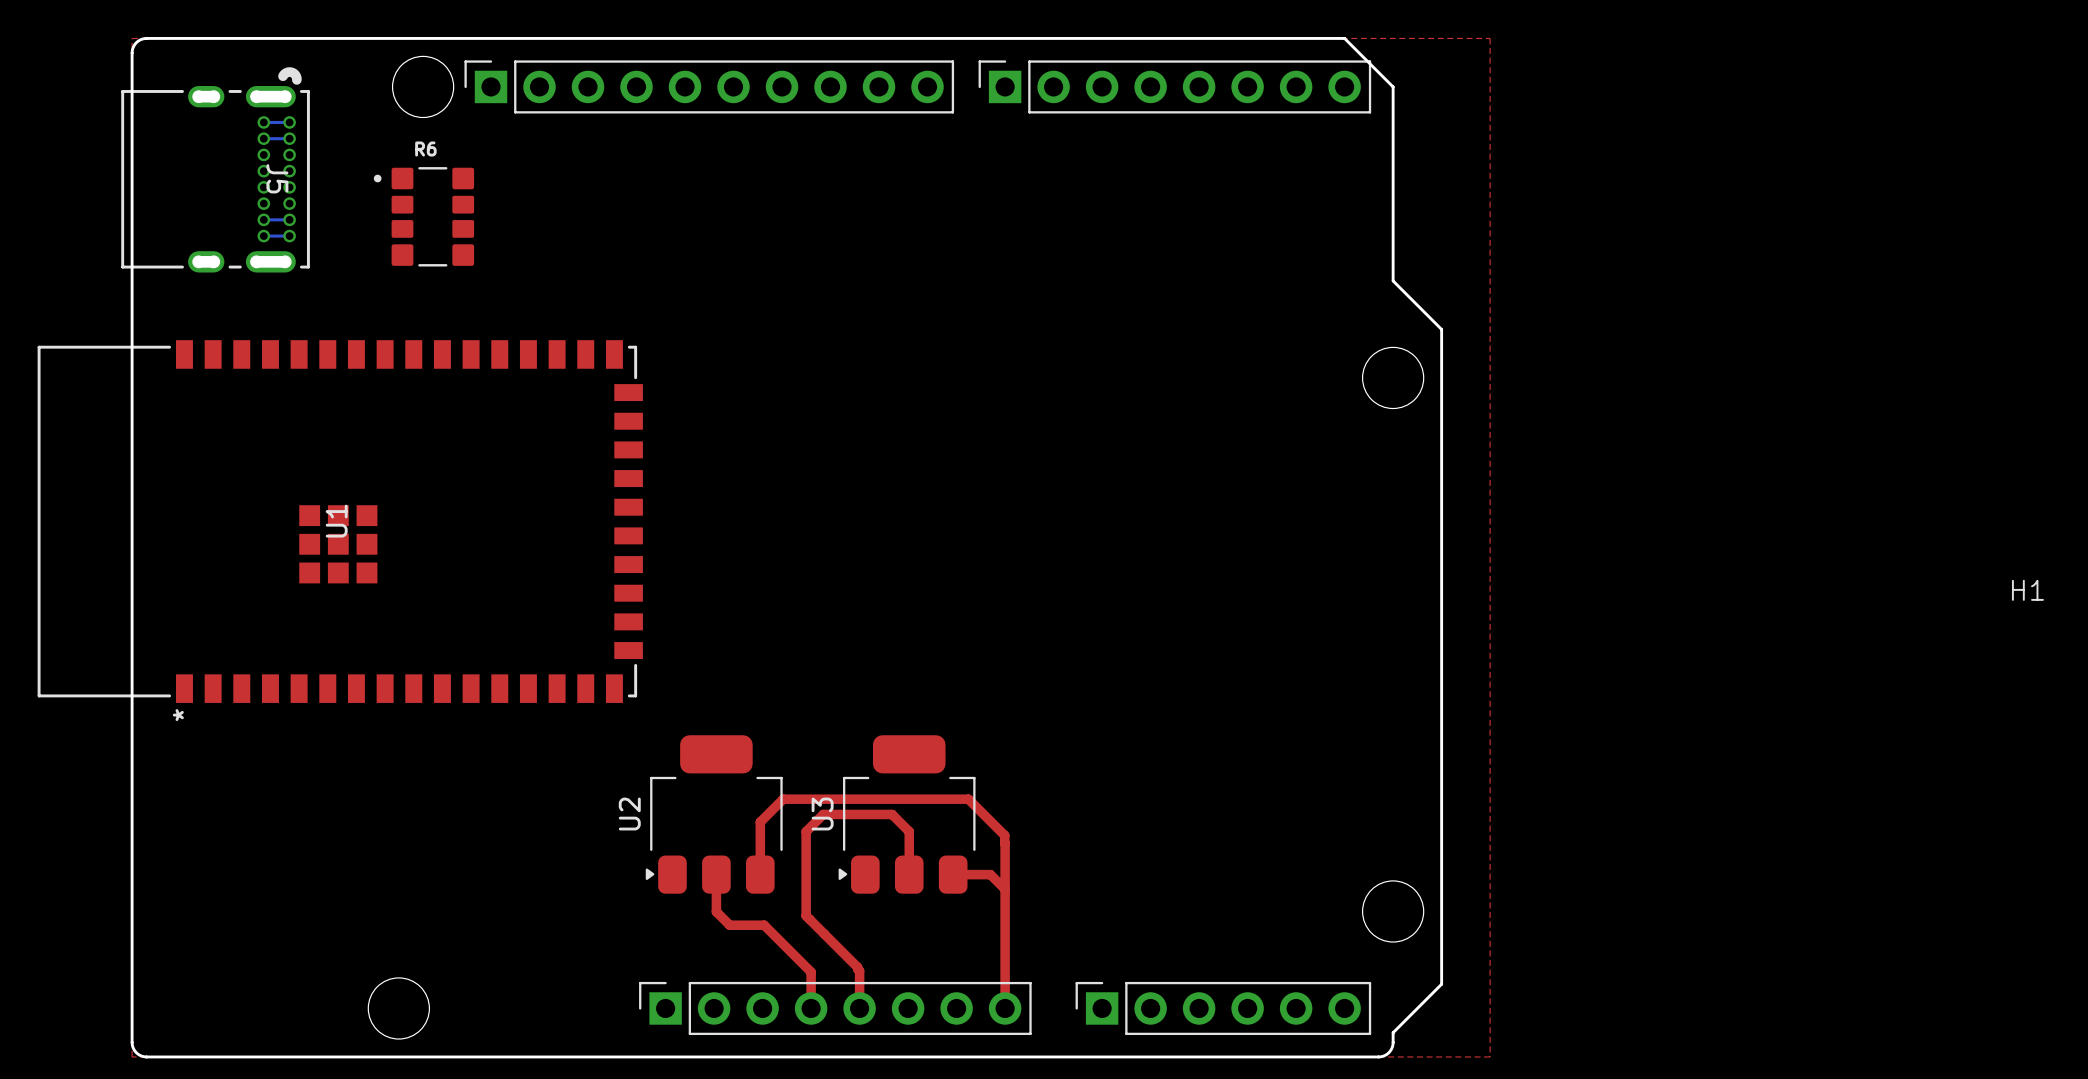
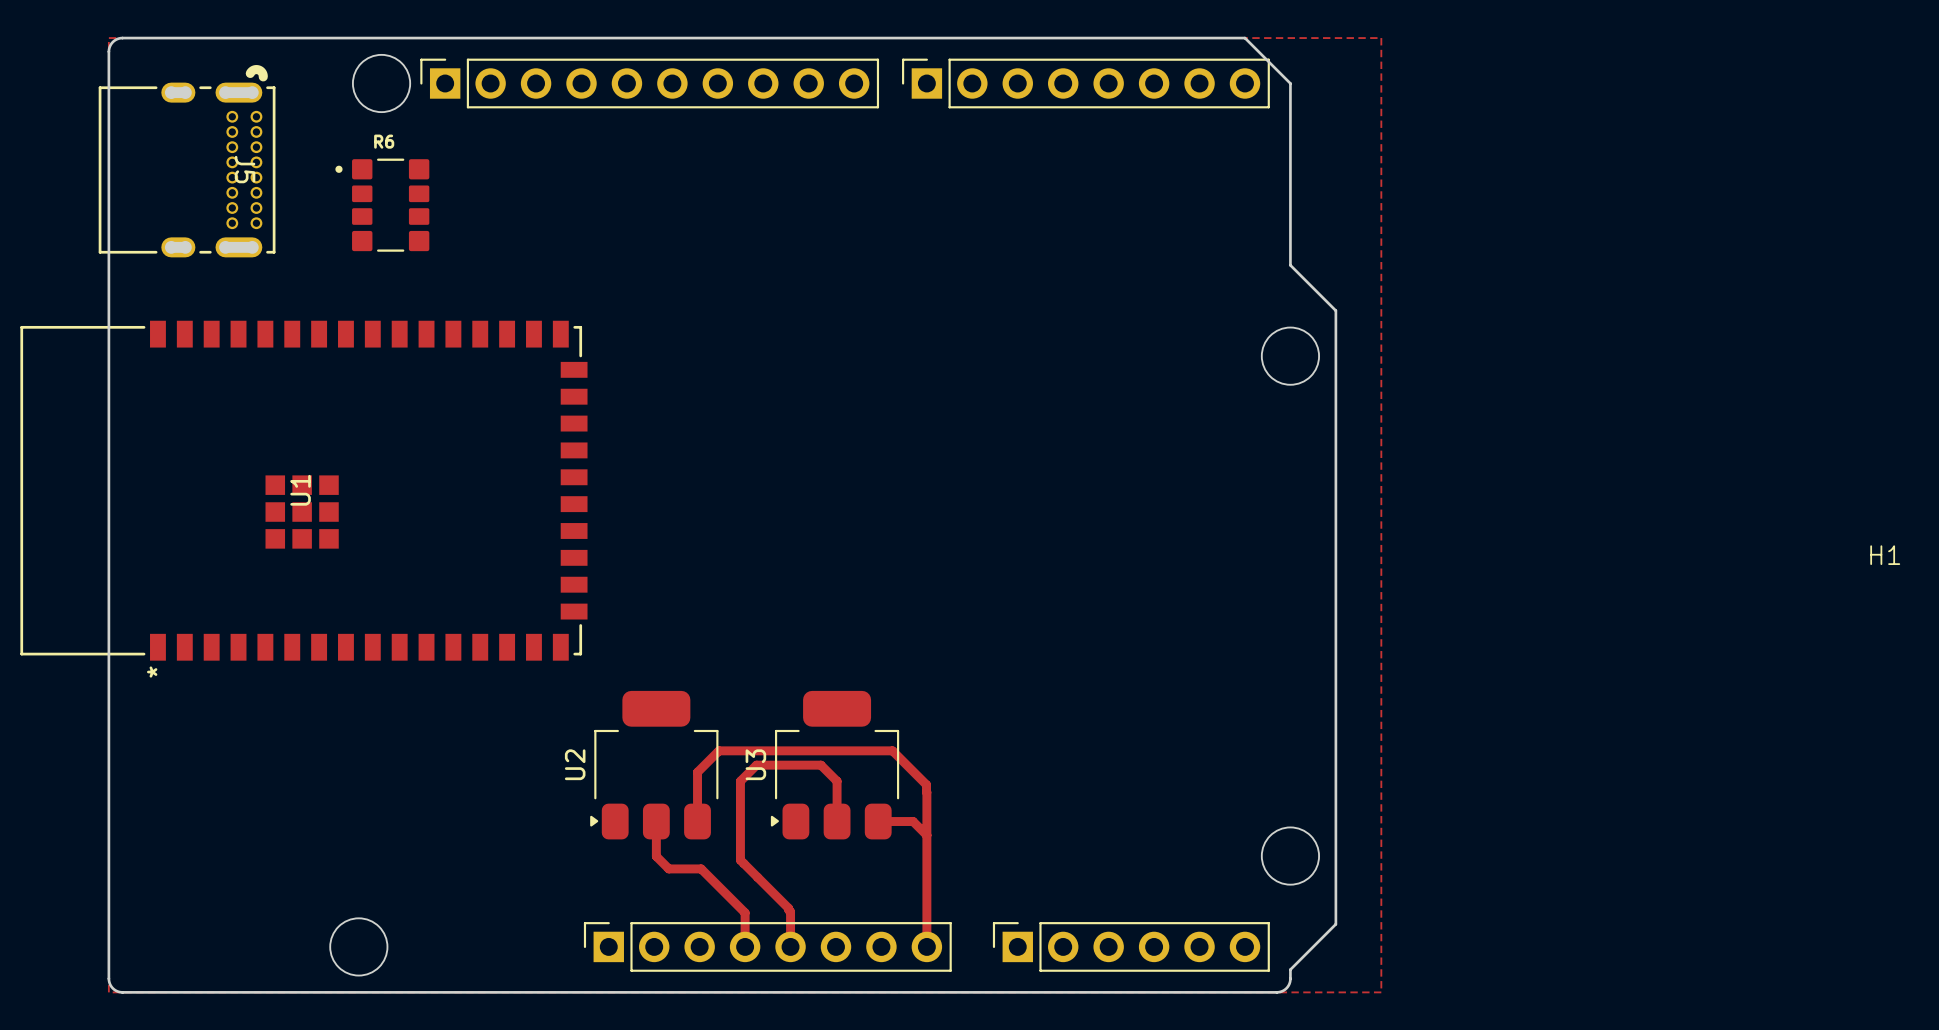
bottom track: (263, 122) (289, 122) -> none
bottom track: (263, 138) (289, 138) -> none
bottom track: (263, 219) (289, 219) -> none
bottom track: (263, 236) (289, 236) -> none

